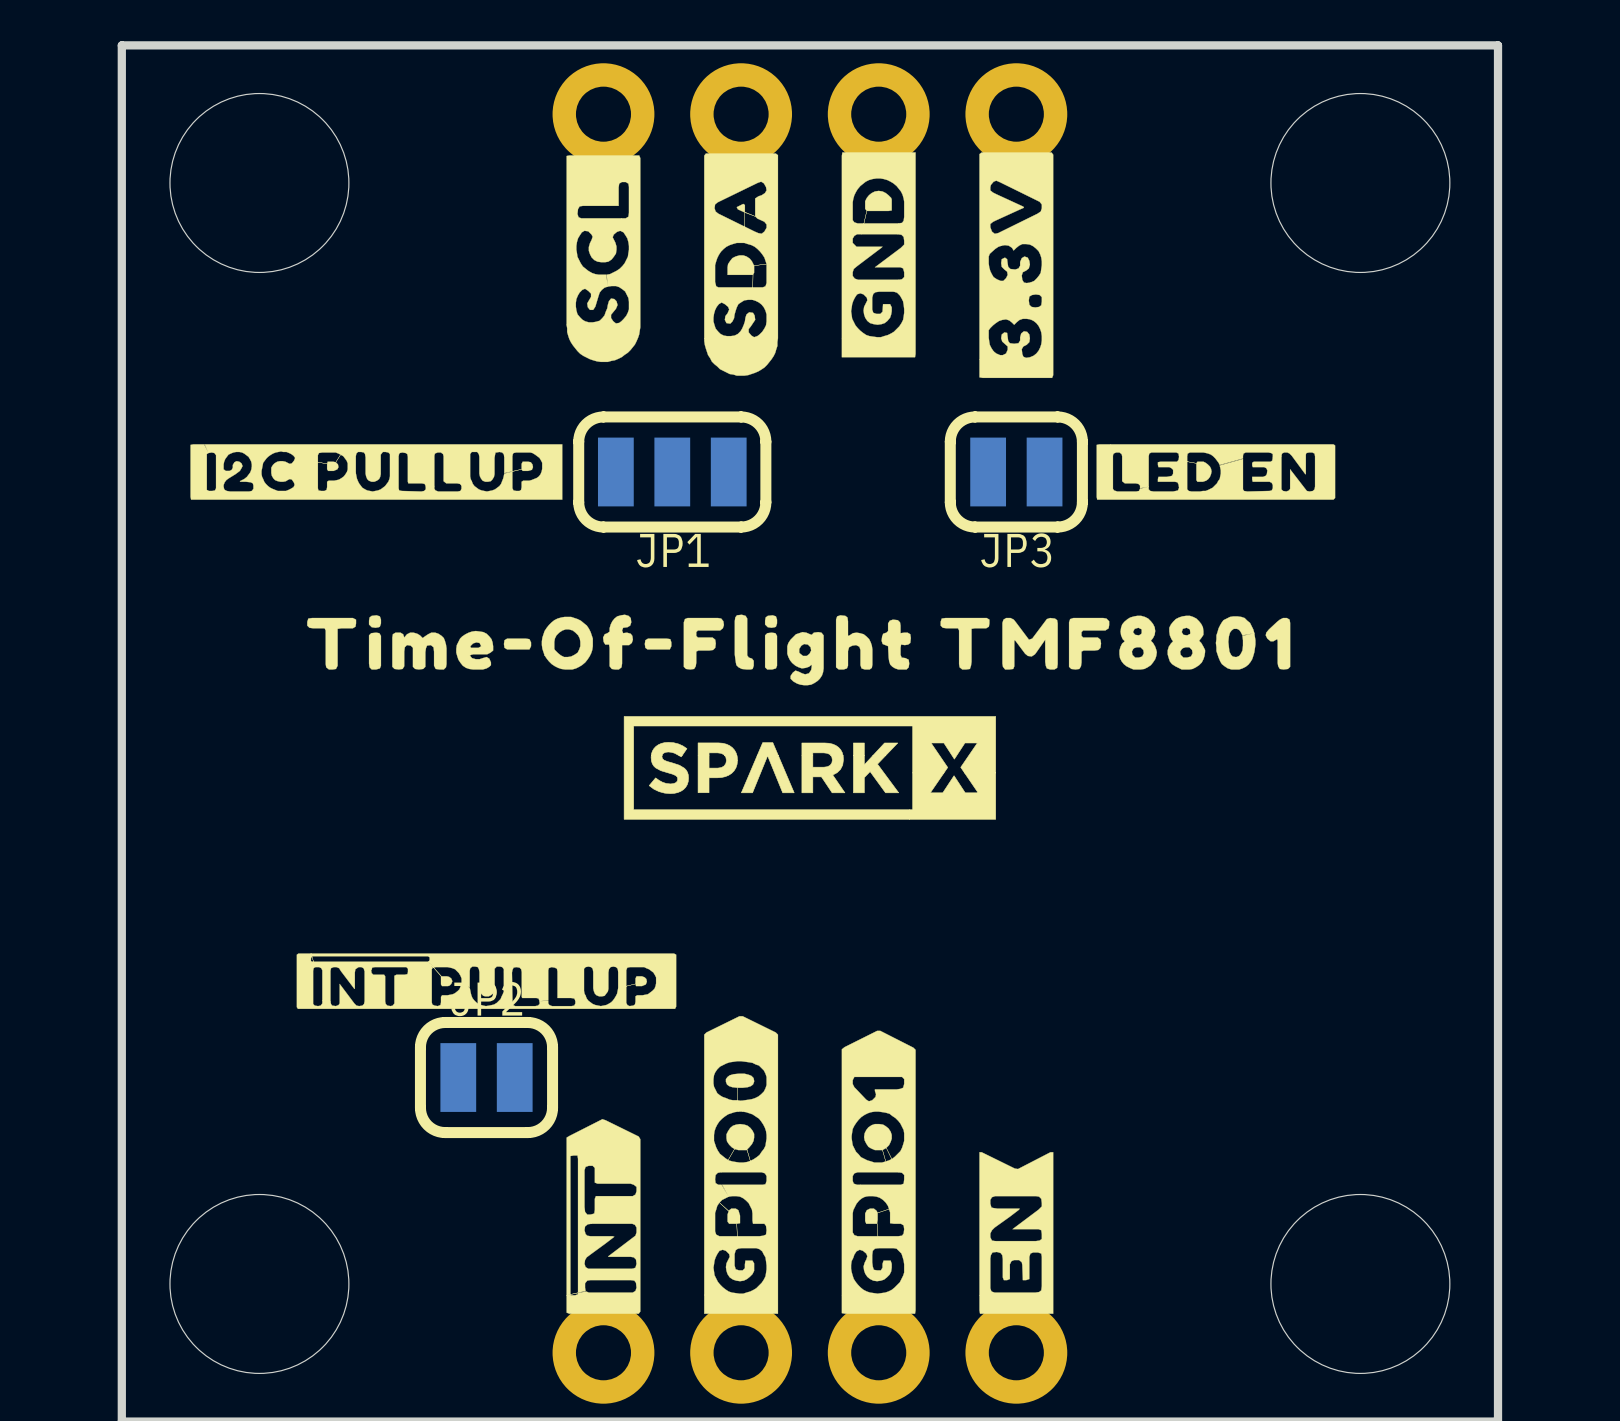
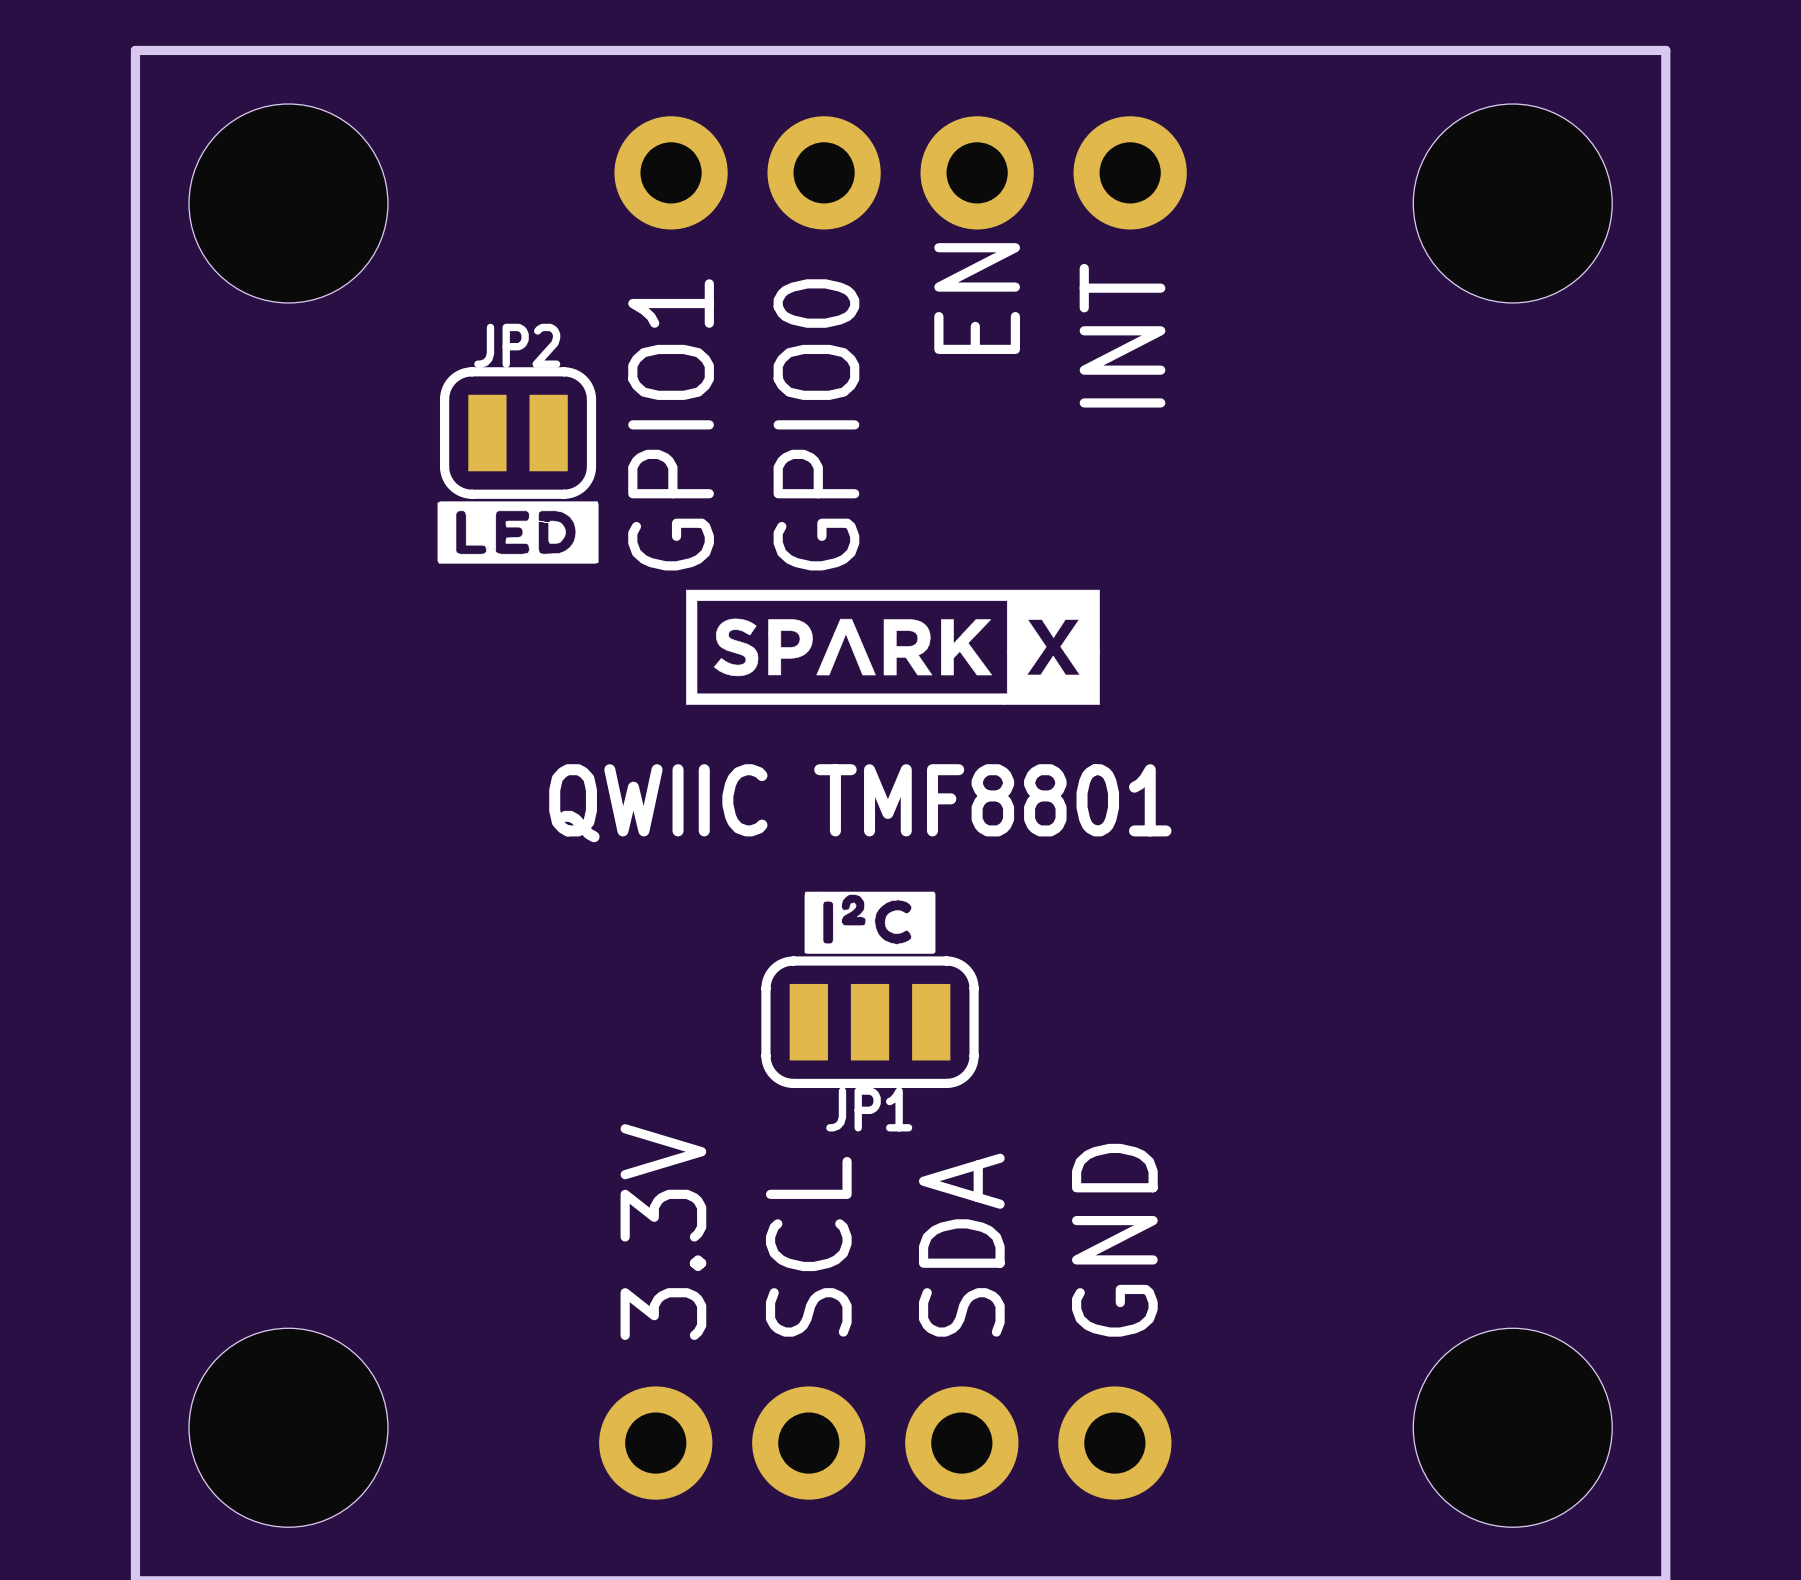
part position: (809, 114) -> (900, 172)
drawing: [566, 152, 1054, 379] -> none
text: none -> EN (977, 298)
text: none -> INT (1122, 335)
text: none -> GPIO1 (671, 424)
text: none -> GPIO0 (816, 424)
JP1 footprint: [573, 411, 772, 533] -> [761, 956, 979, 1089]
drawing: [190, 444, 563, 500] -> none
drawing: [1096, 444, 1336, 500] -> none
drawing: none -> [437, 501, 599, 564]
JP3: (1016, 471) -> none
drawing: [307, 614, 1291, 686] -> none
text: none -> QWIIC TMF8801 (860, 803)
drawing position: (809, 767) -> (892, 647)
drawing: none -> [804, 891, 936, 954]
drawing: [296, 953, 1054, 1314] -> none
JP2 footprint: [414, 1016, 559, 1139] -> [439, 367, 597, 499]
text: none -> 3.3V (663, 1232)
text: none -> SDA (961, 1245)
text: none -> GND (1114, 1240)
text: none -> SCL (808, 1246)
part position: (809, 1352) -> (885, 1443)

